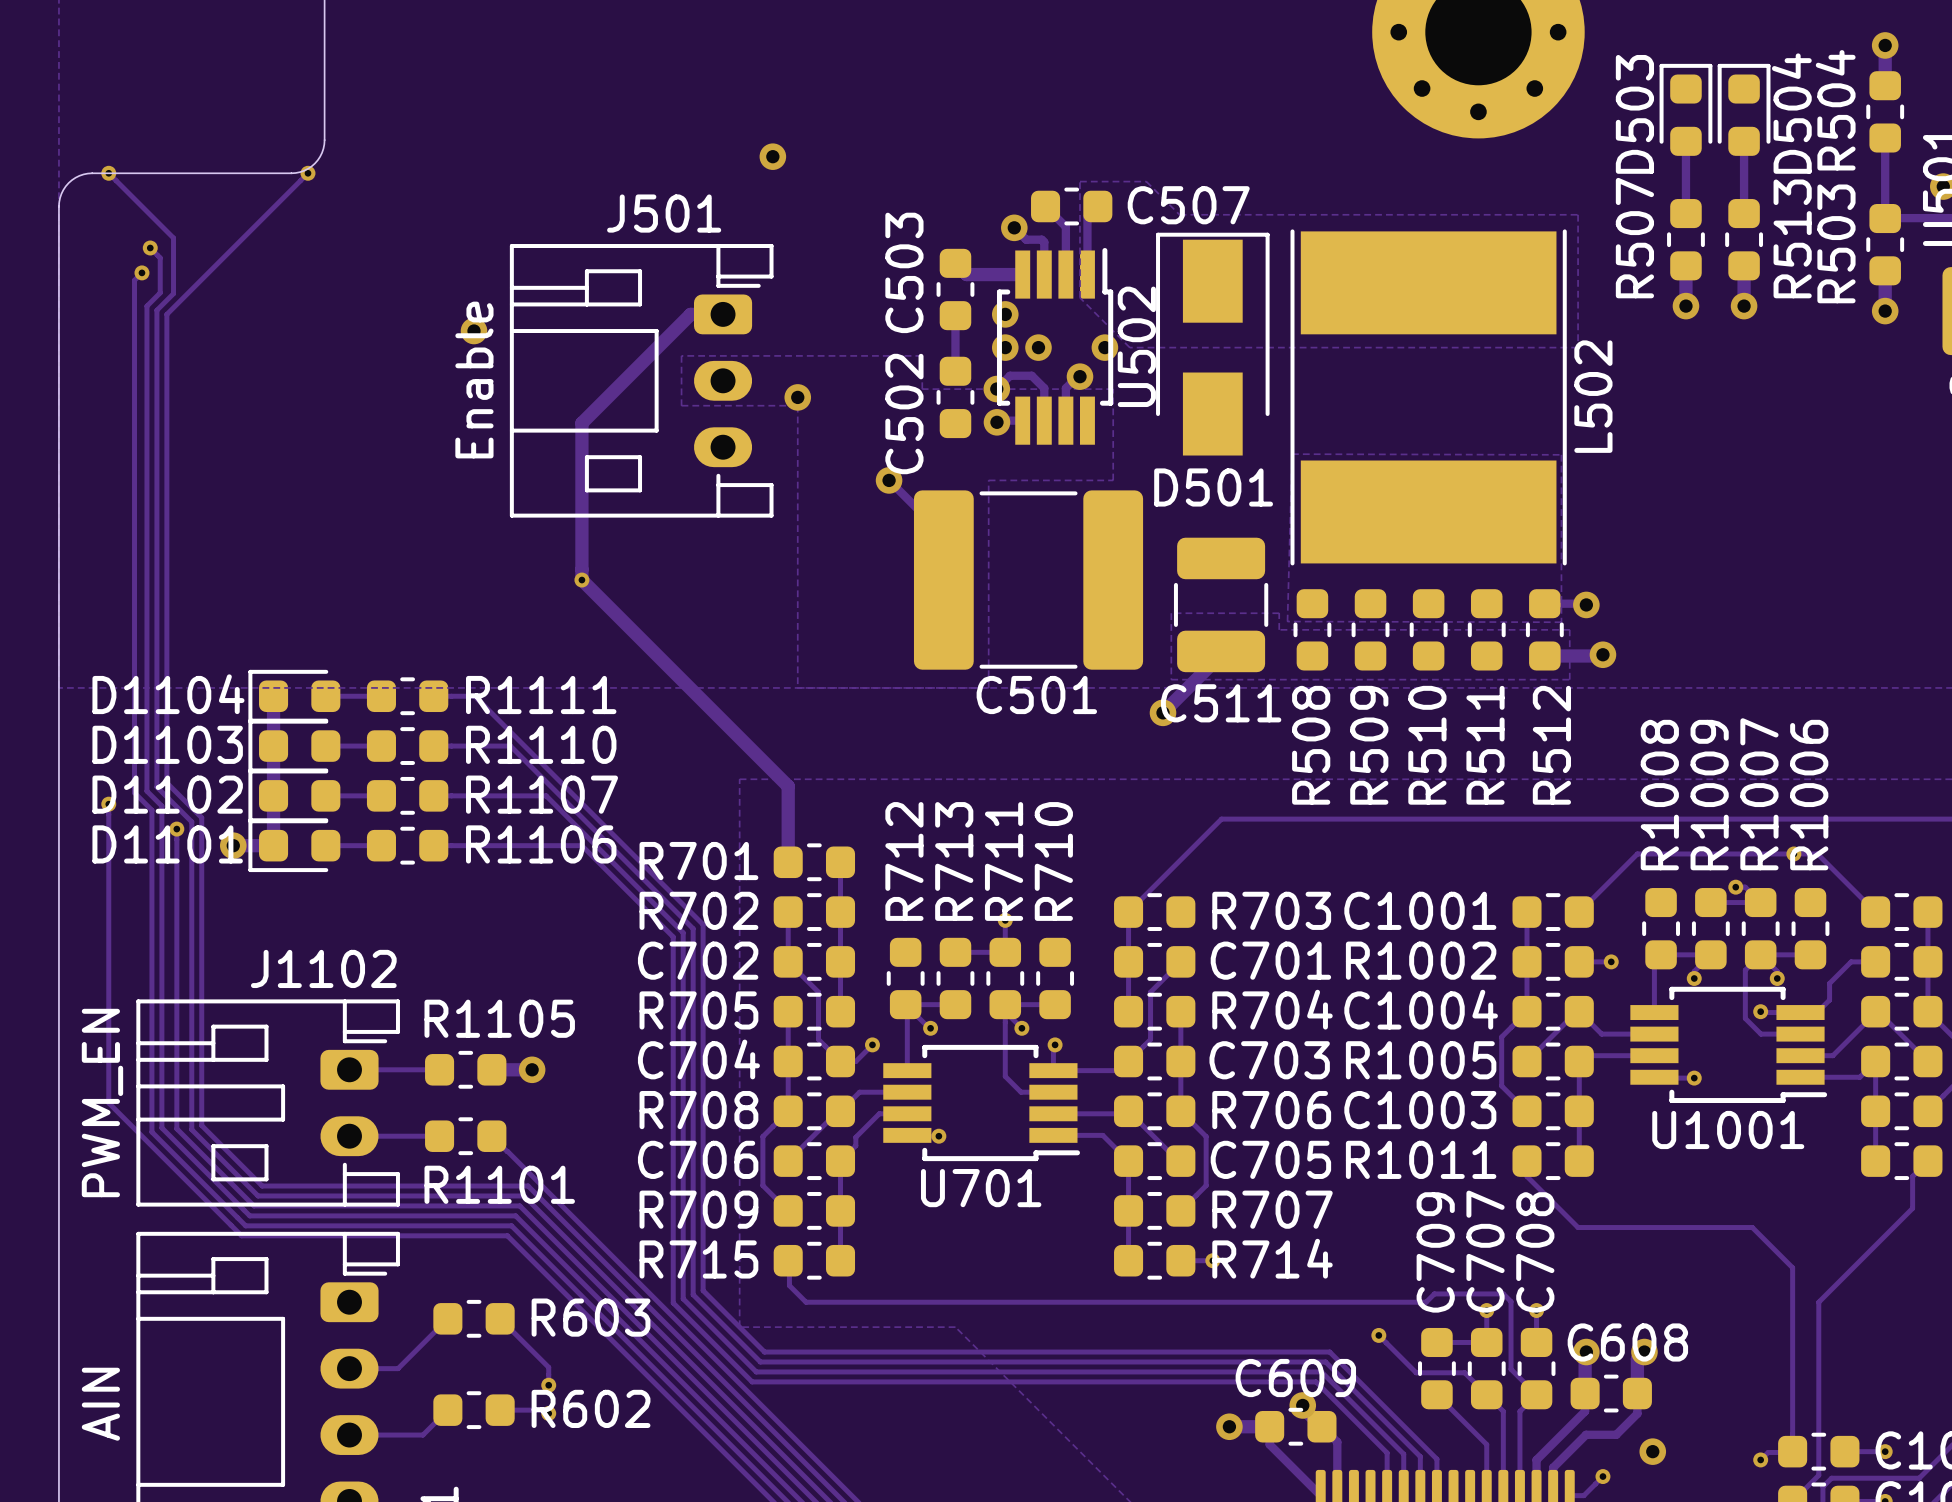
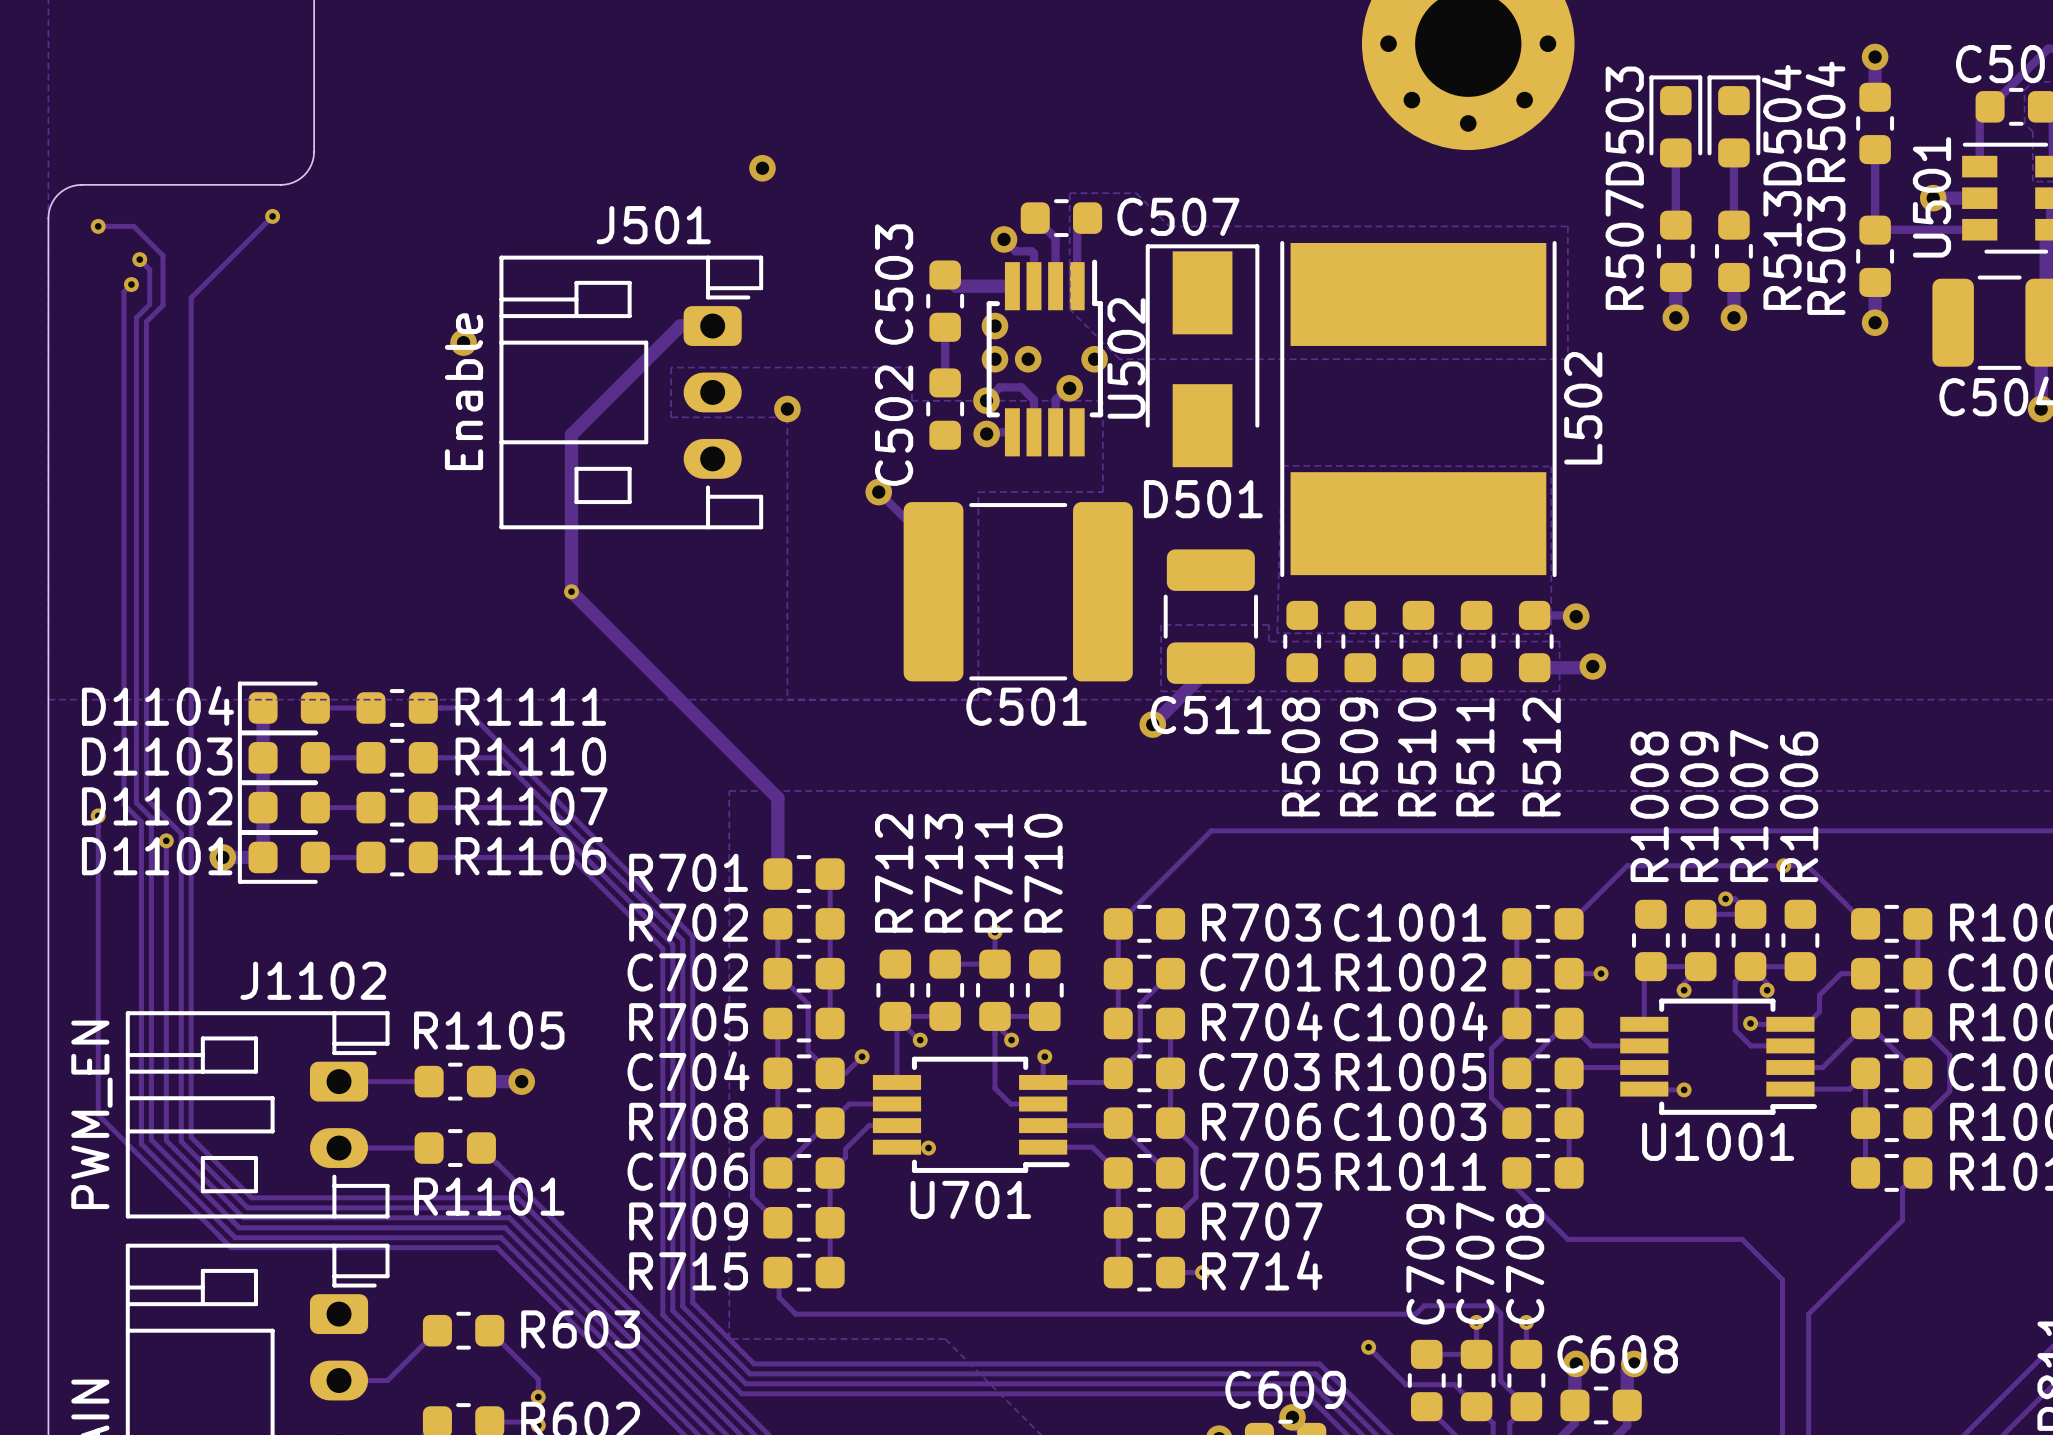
track: (108, 173) (173, 238) (173, 244) -> (98, 226) (133, 226) (163, 255)
via position: (108, 173) -> (98, 226)
track: (307, 173) (166, 314) (166, 782) (201, 817) -> (272, 216) (191, 297) (191, 829)
via position: (307, 173) -> (272, 216)

